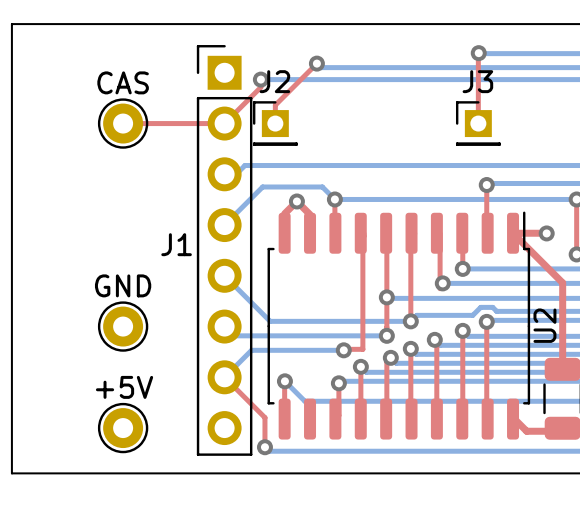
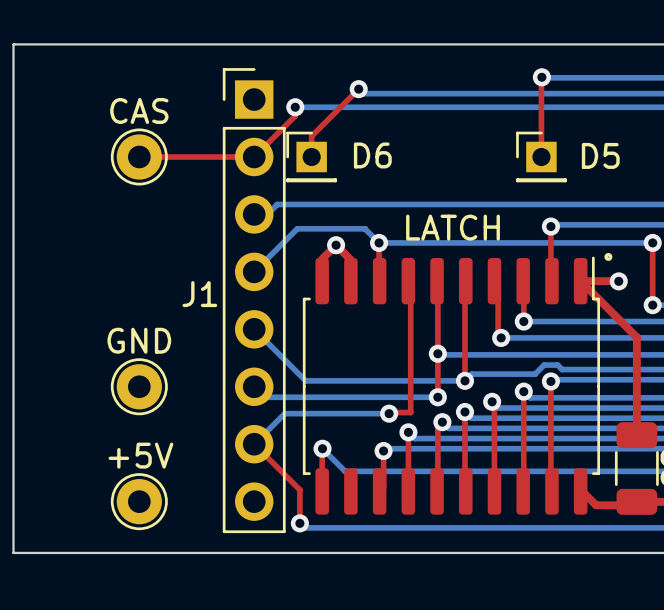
J2 name: J2 (274, 81) -> D6 (372, 155)
J3 name: J3 (477, 81) -> D5 (600, 155)
drawing: none -> [604, 252, 613, 261]
U2 name: U2 (544, 325) -> LATCH (453, 227)

